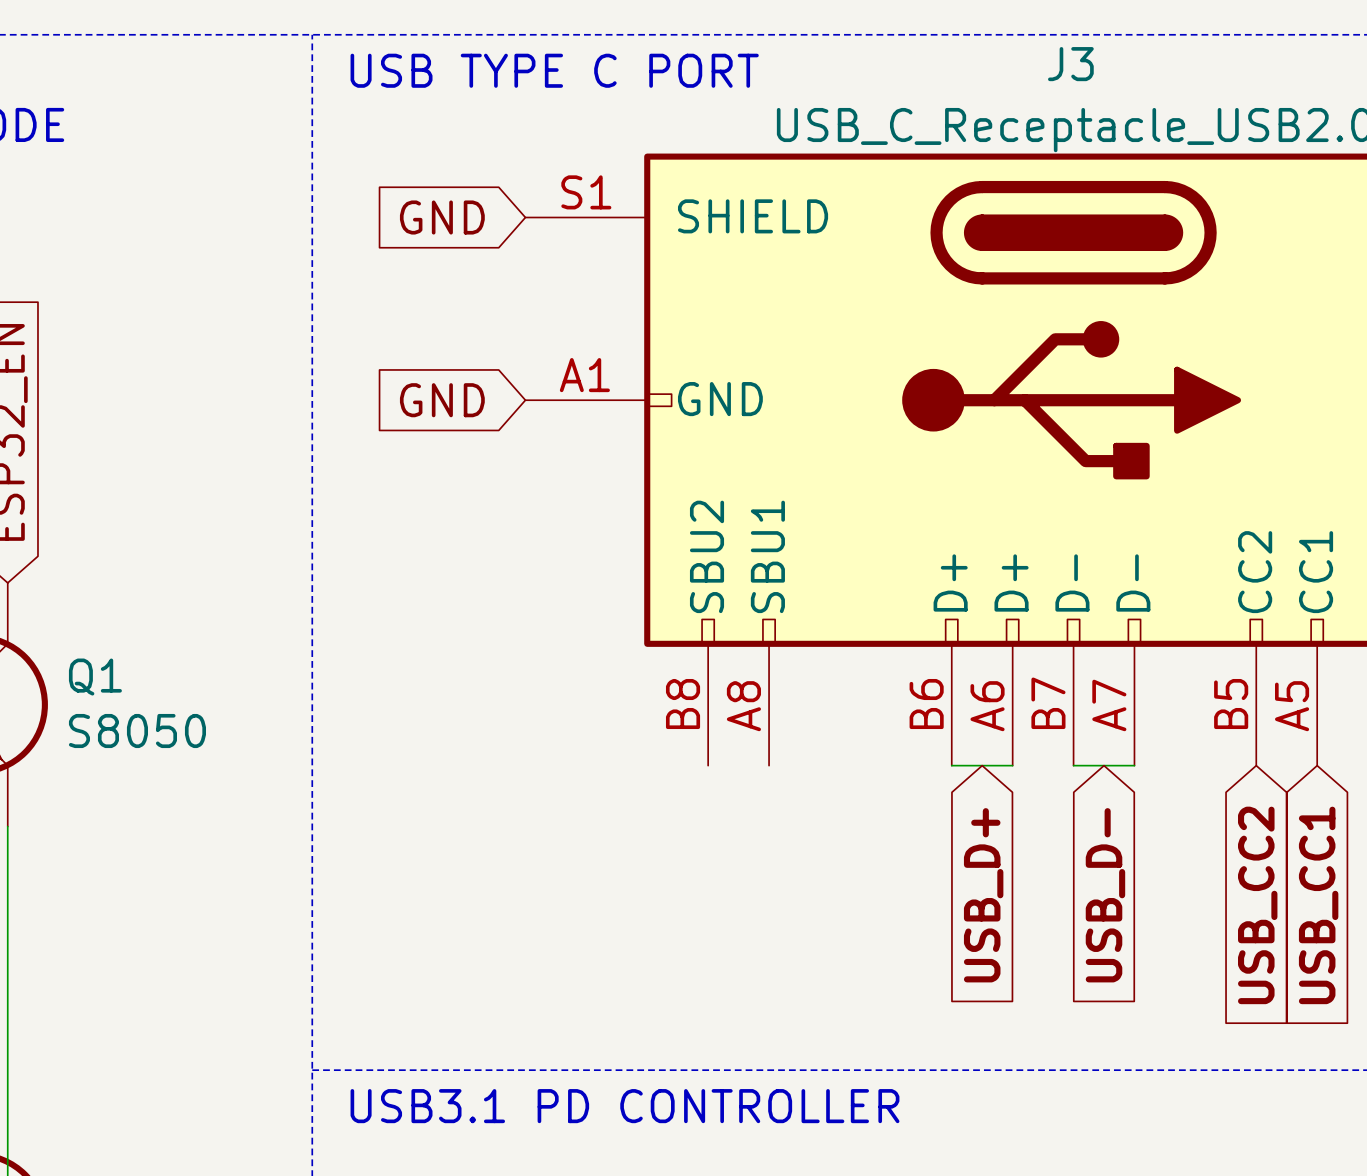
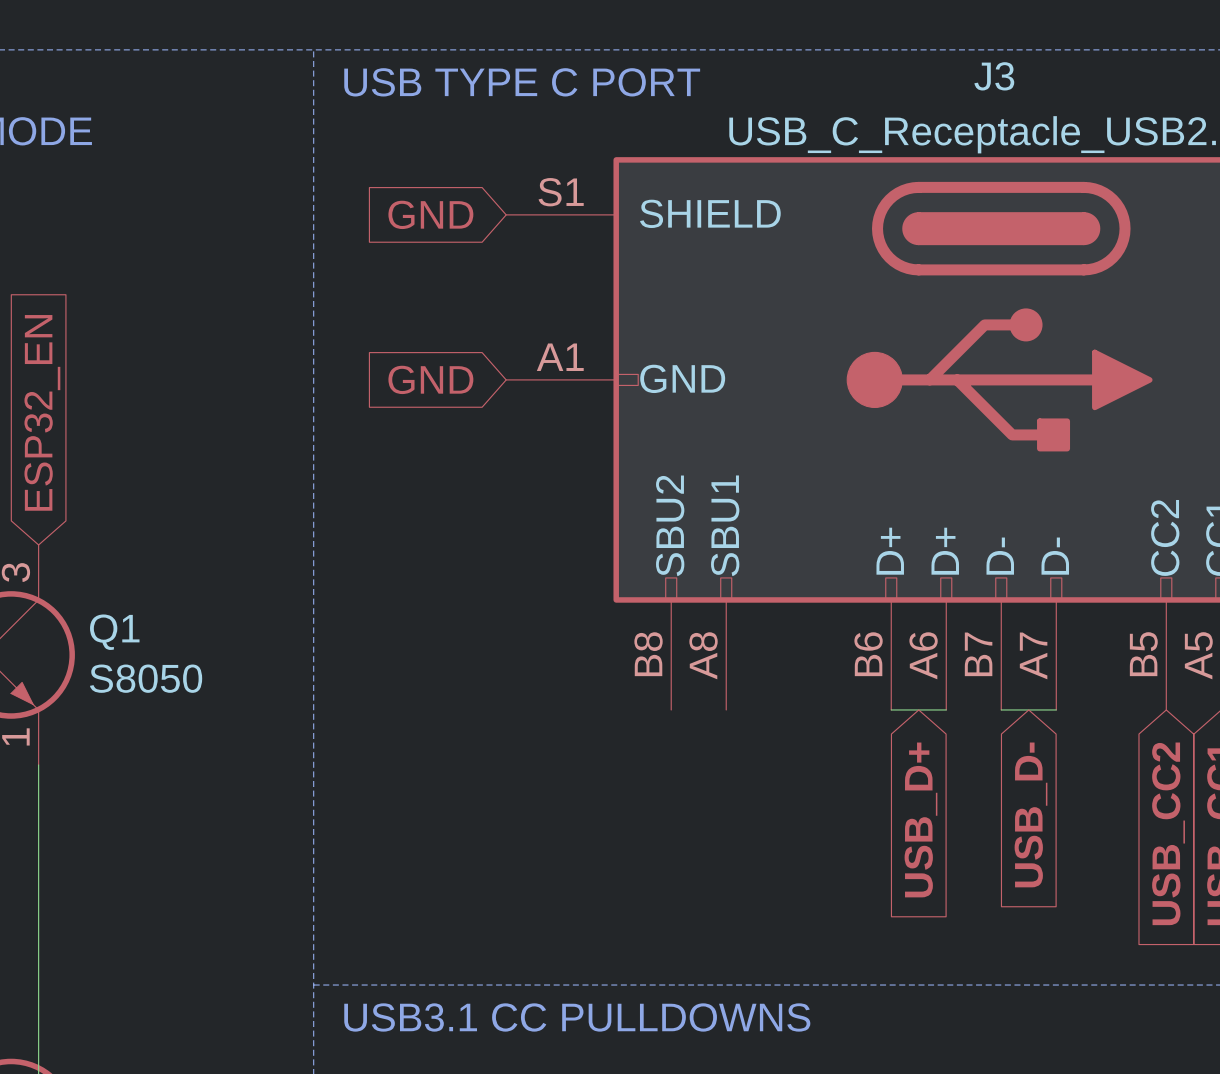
text: USB3.1 PD CONTROLLER (624, 1106) -> USB3.1 CC PULLDOWNS (577, 1017)

